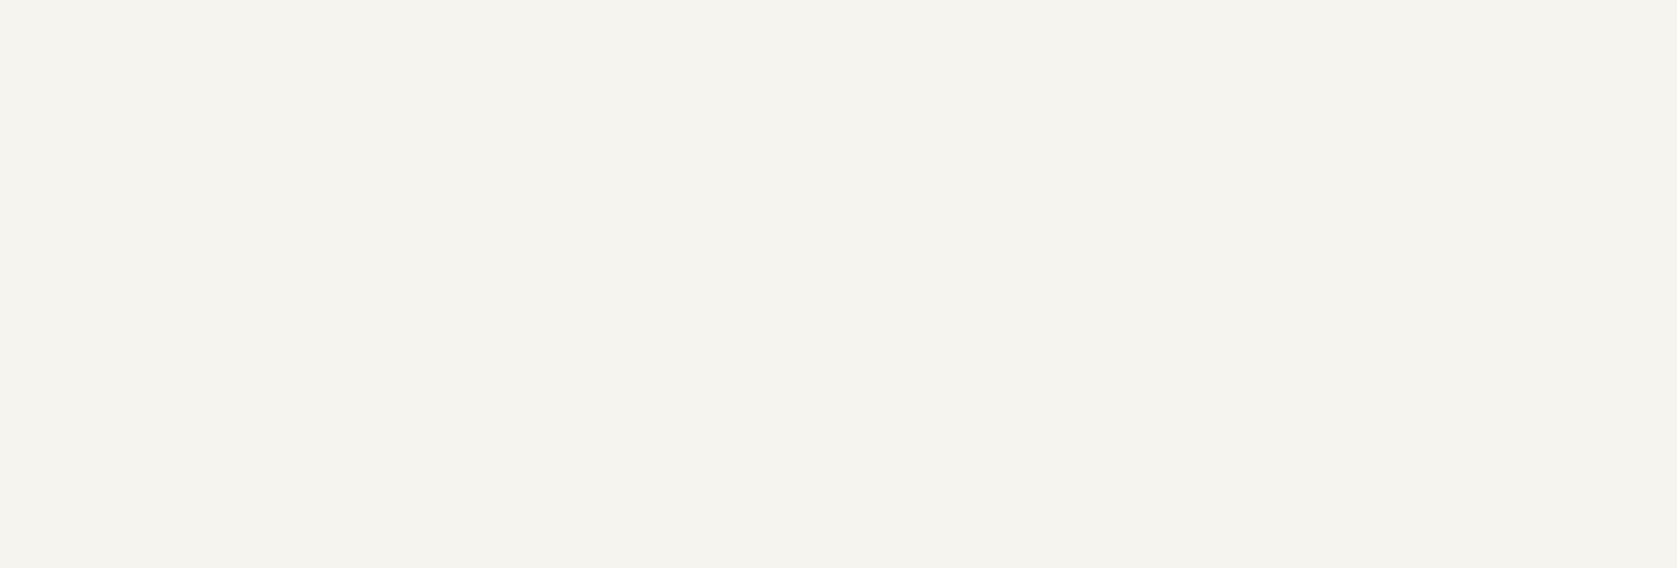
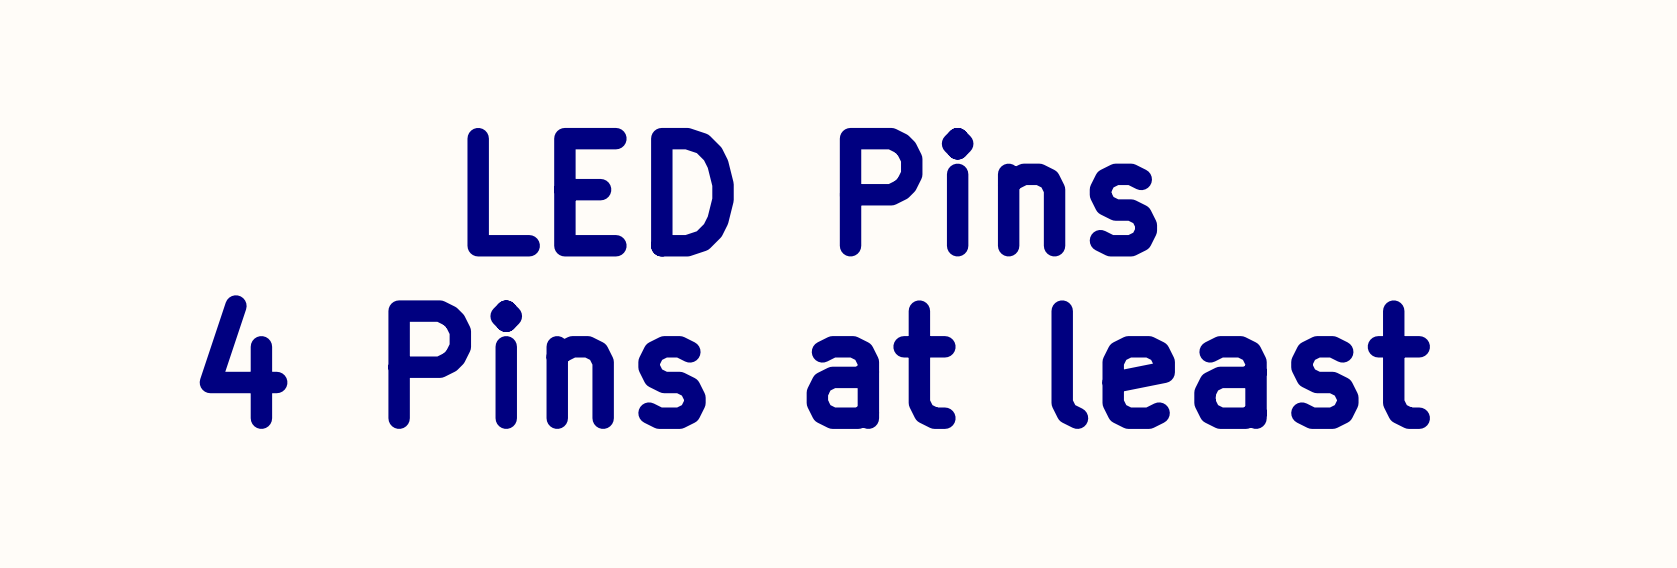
text: none -> LED Pins (812, 192)
text: none -> 4 Pins at least (814, 362)

